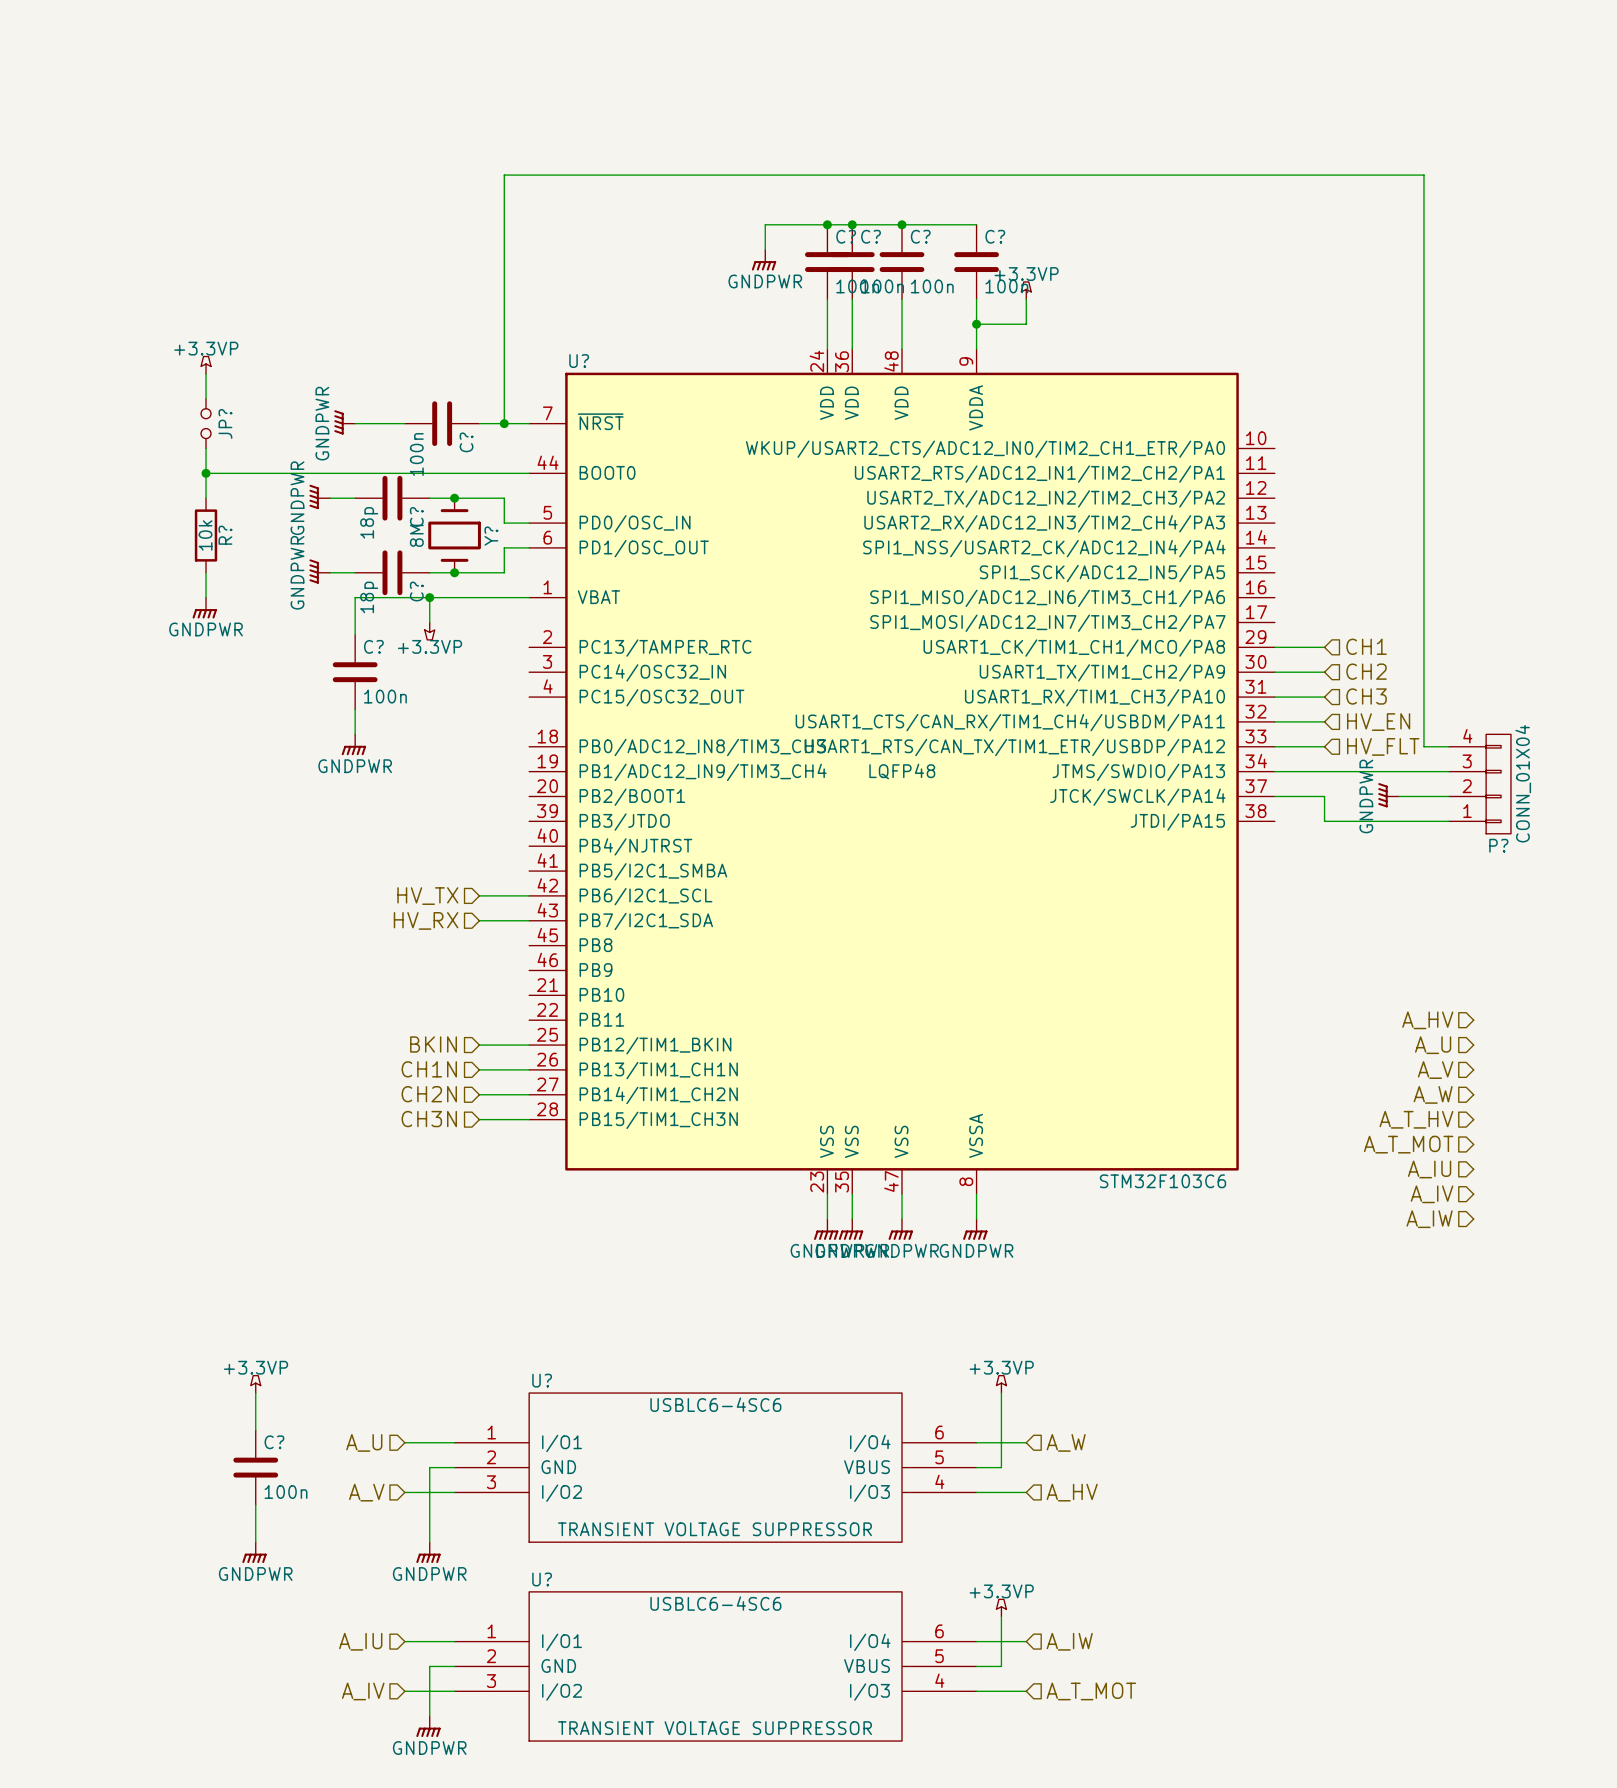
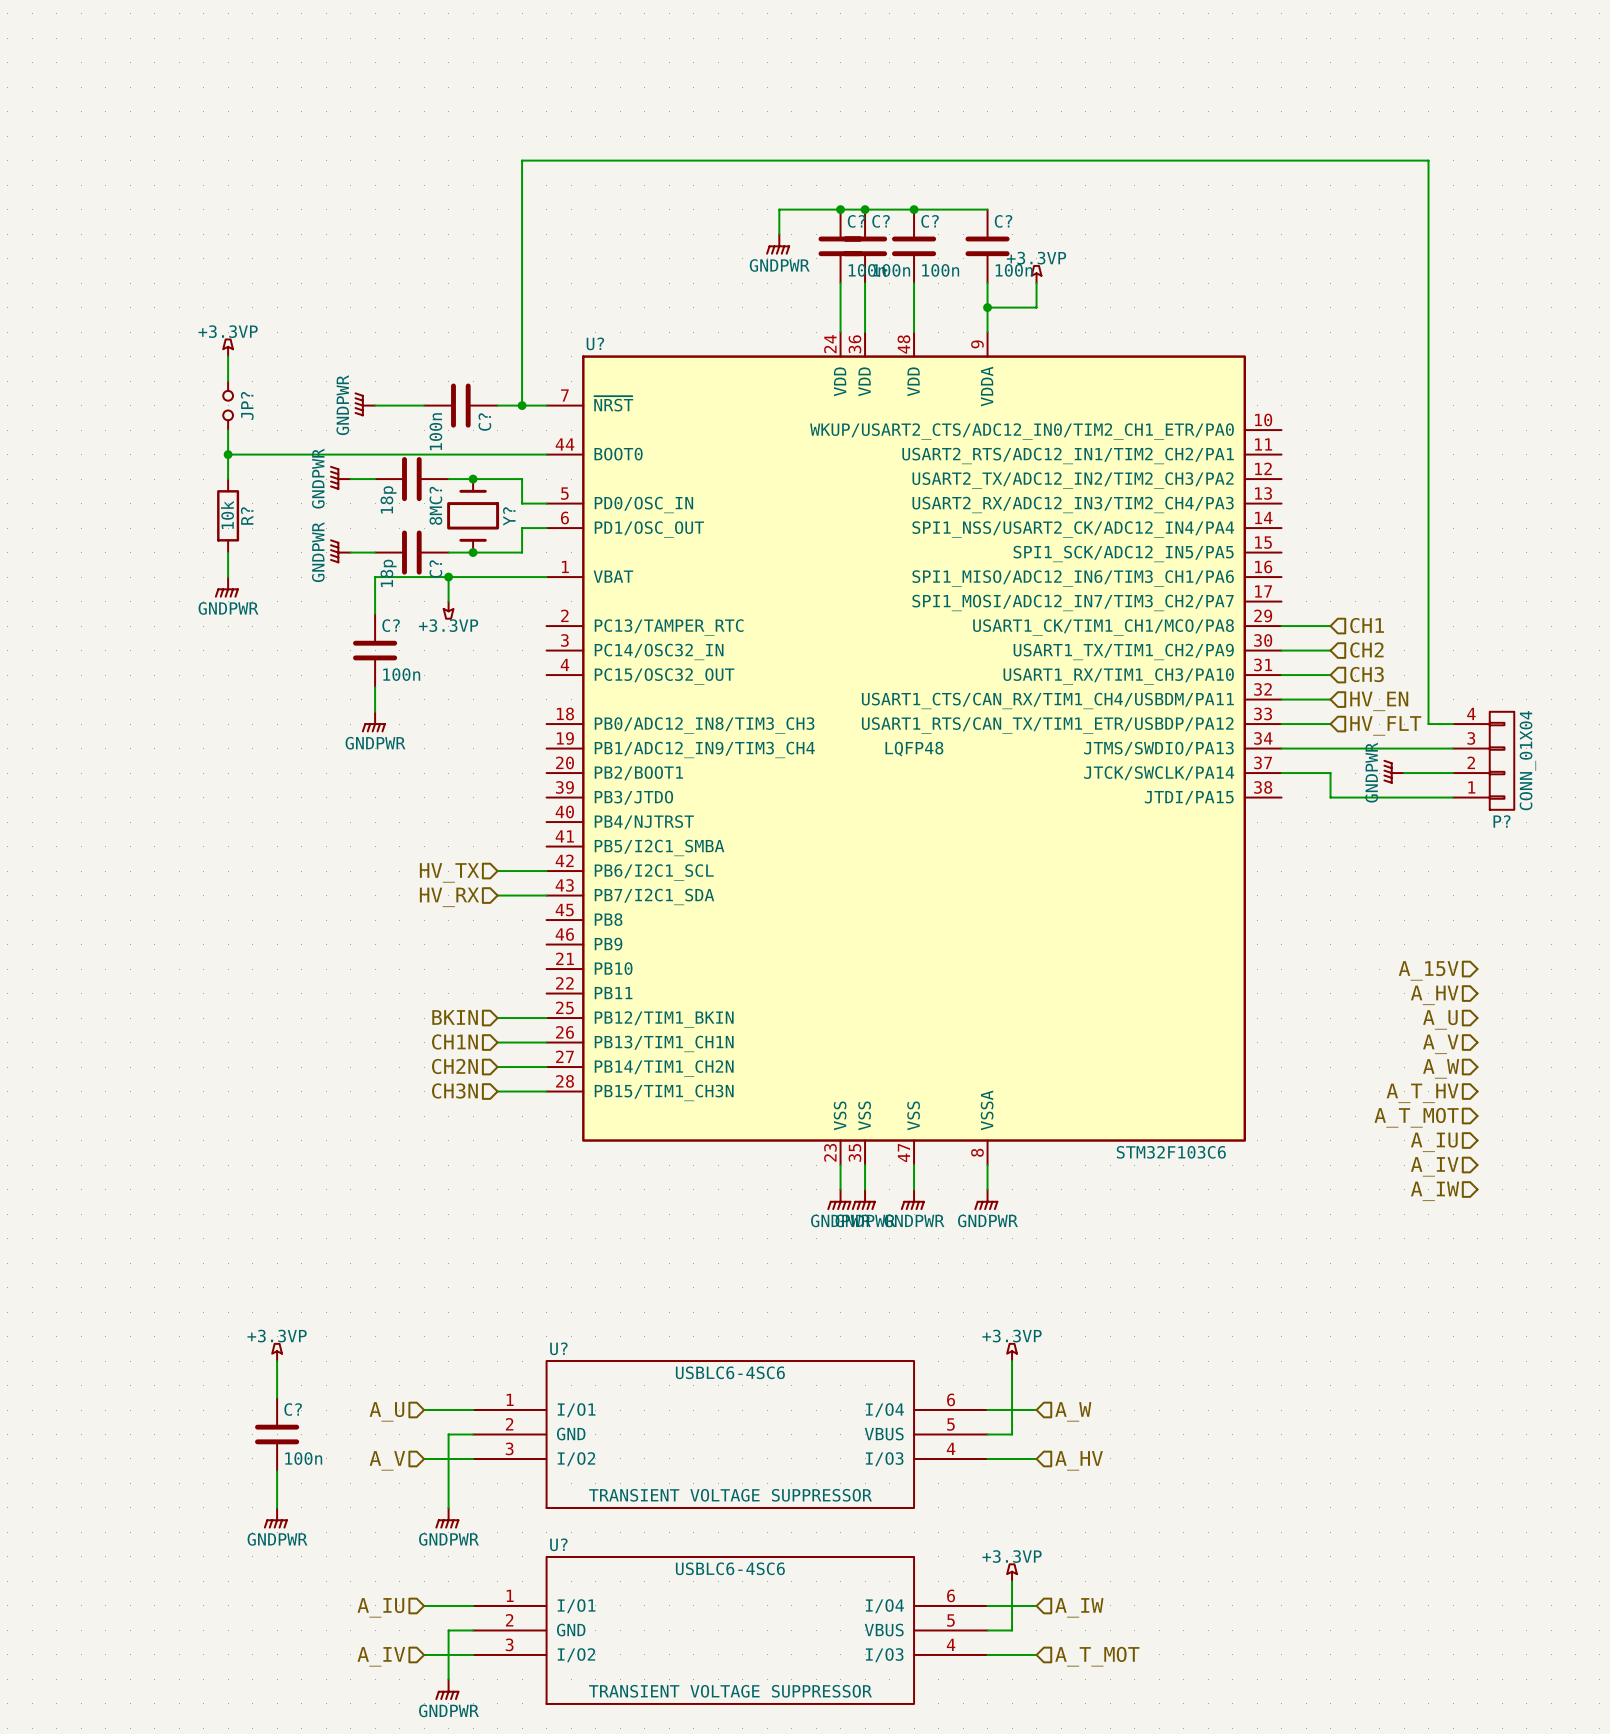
hierarchical label: none -> A_15V (1428, 970)

